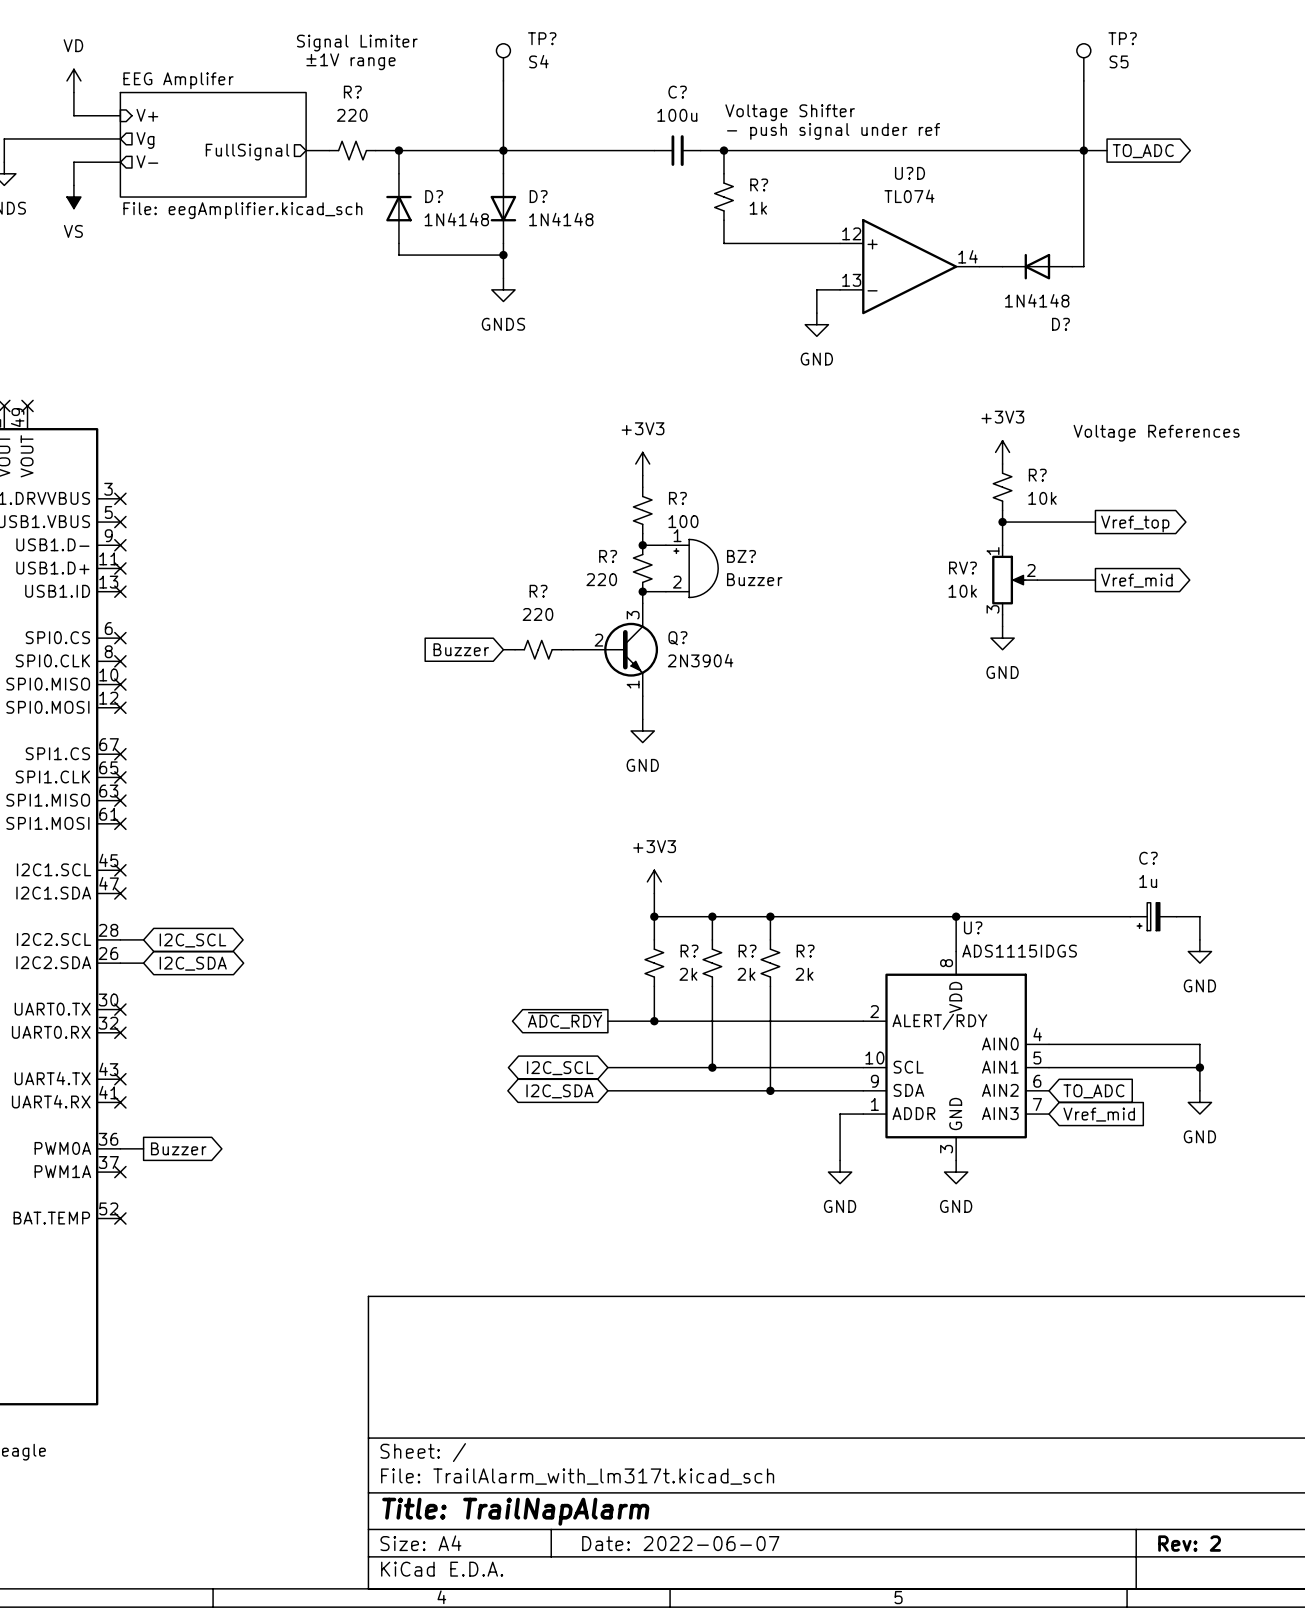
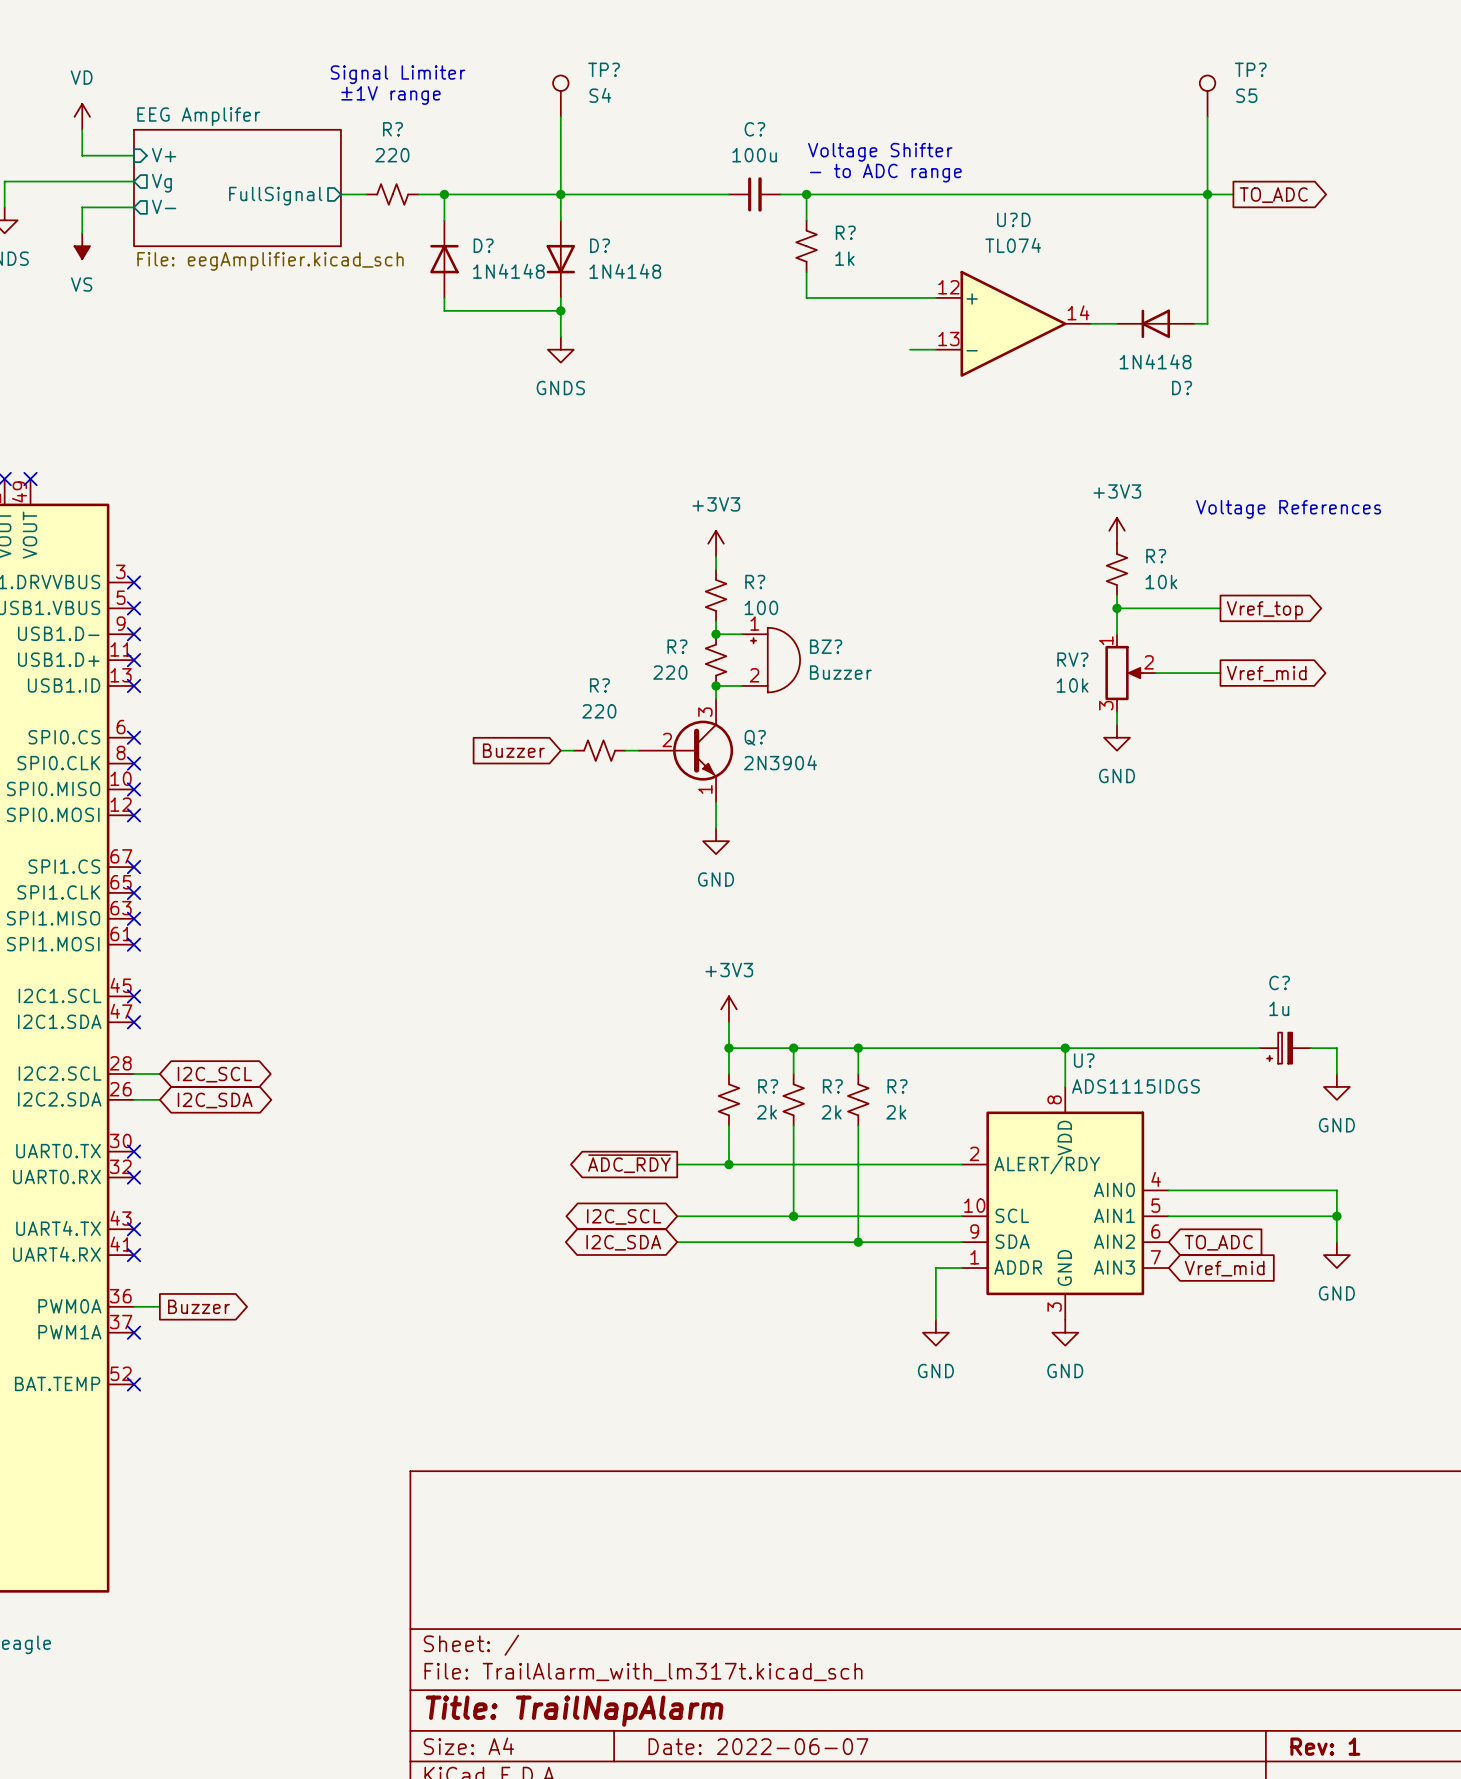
text: - push signal under ref (833, 131) -> - to ADC range (885, 173)
wire: (816, 289) (816, 313) -> none
power symbol: GND (816, 324) -> none
title block: Rev: 2 (1189, 1543) -> Rev: 1 (1325, 1746)

